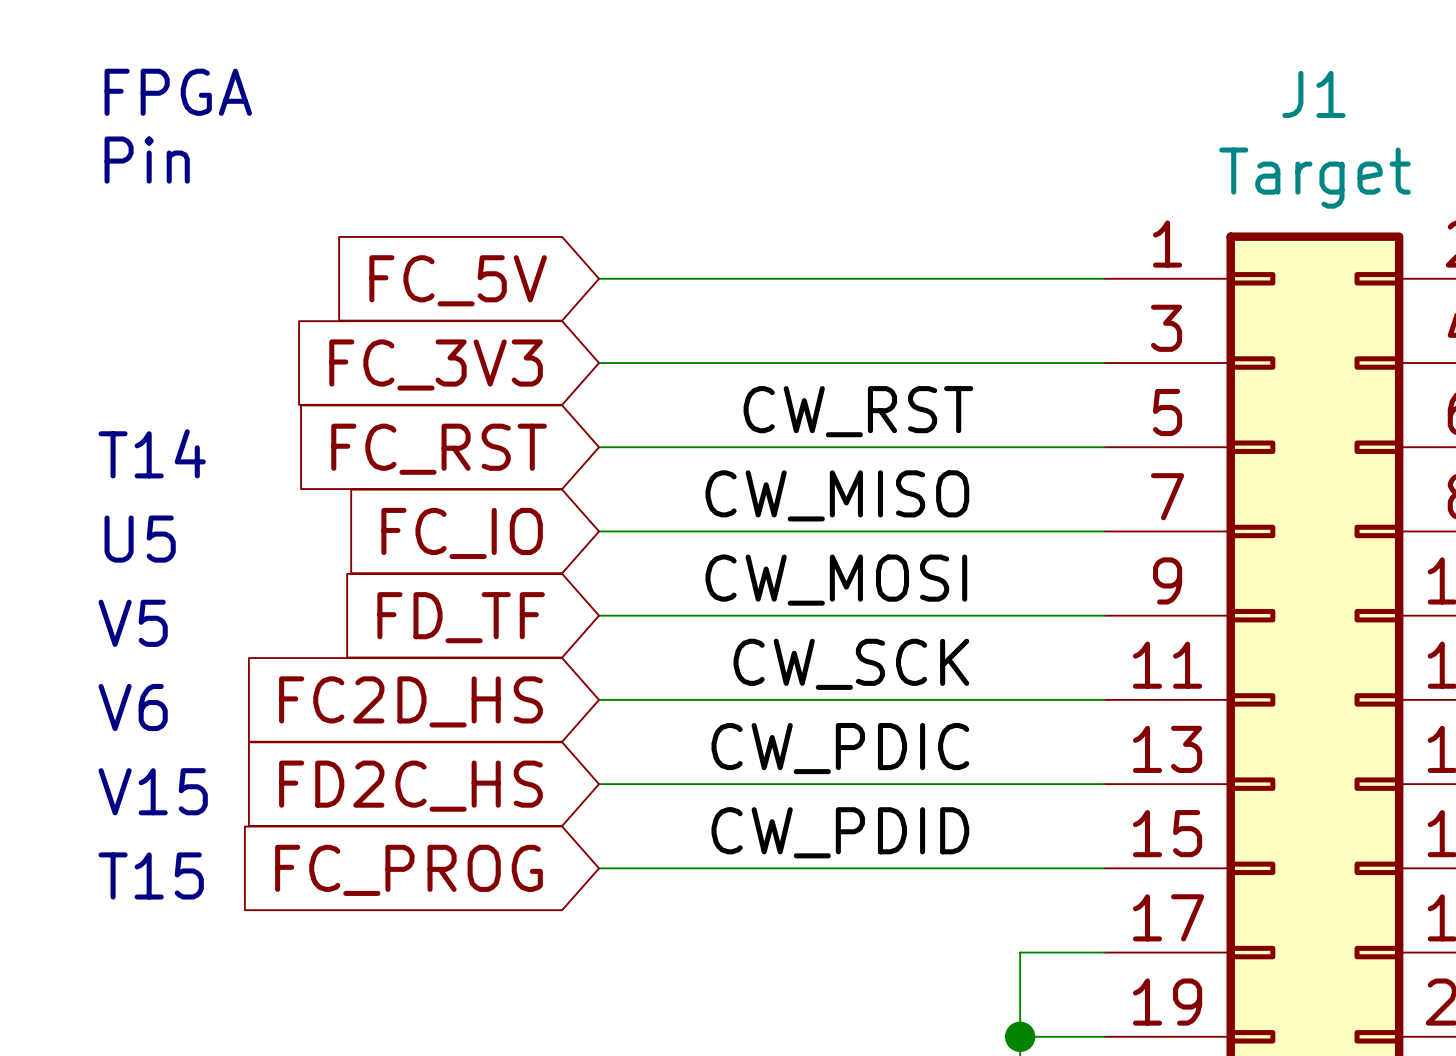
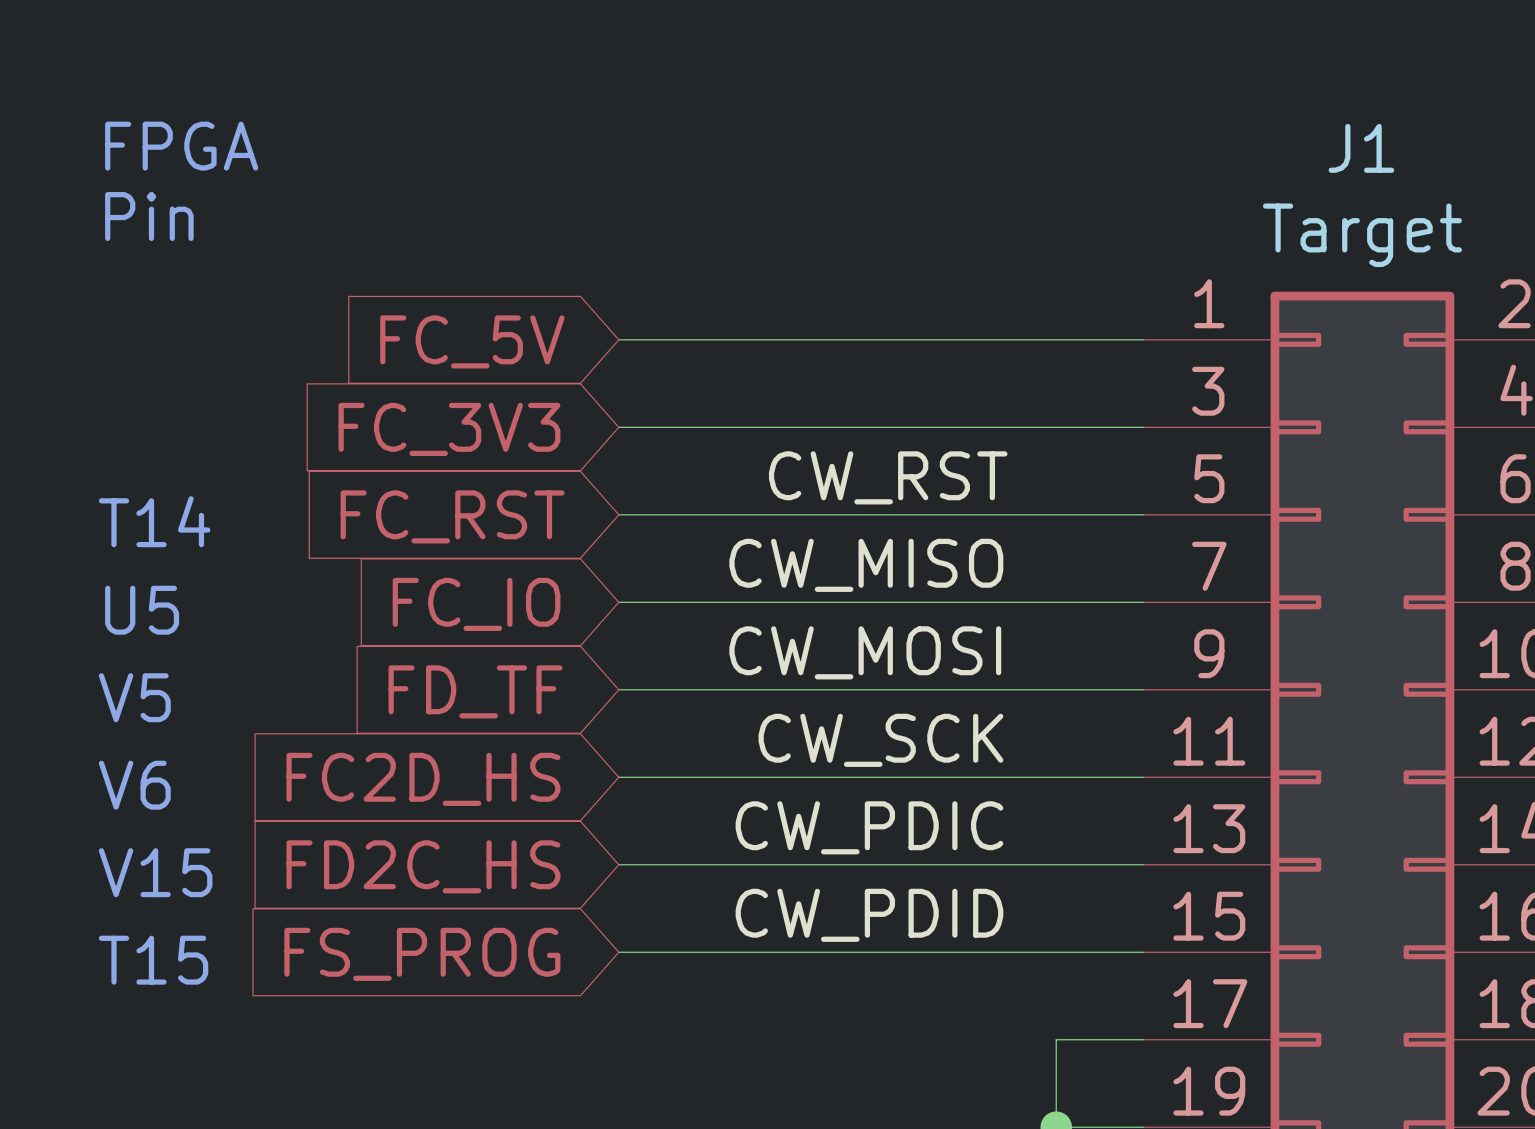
global label: FC_PROG (408, 870) -> FS_PROG (422, 954)

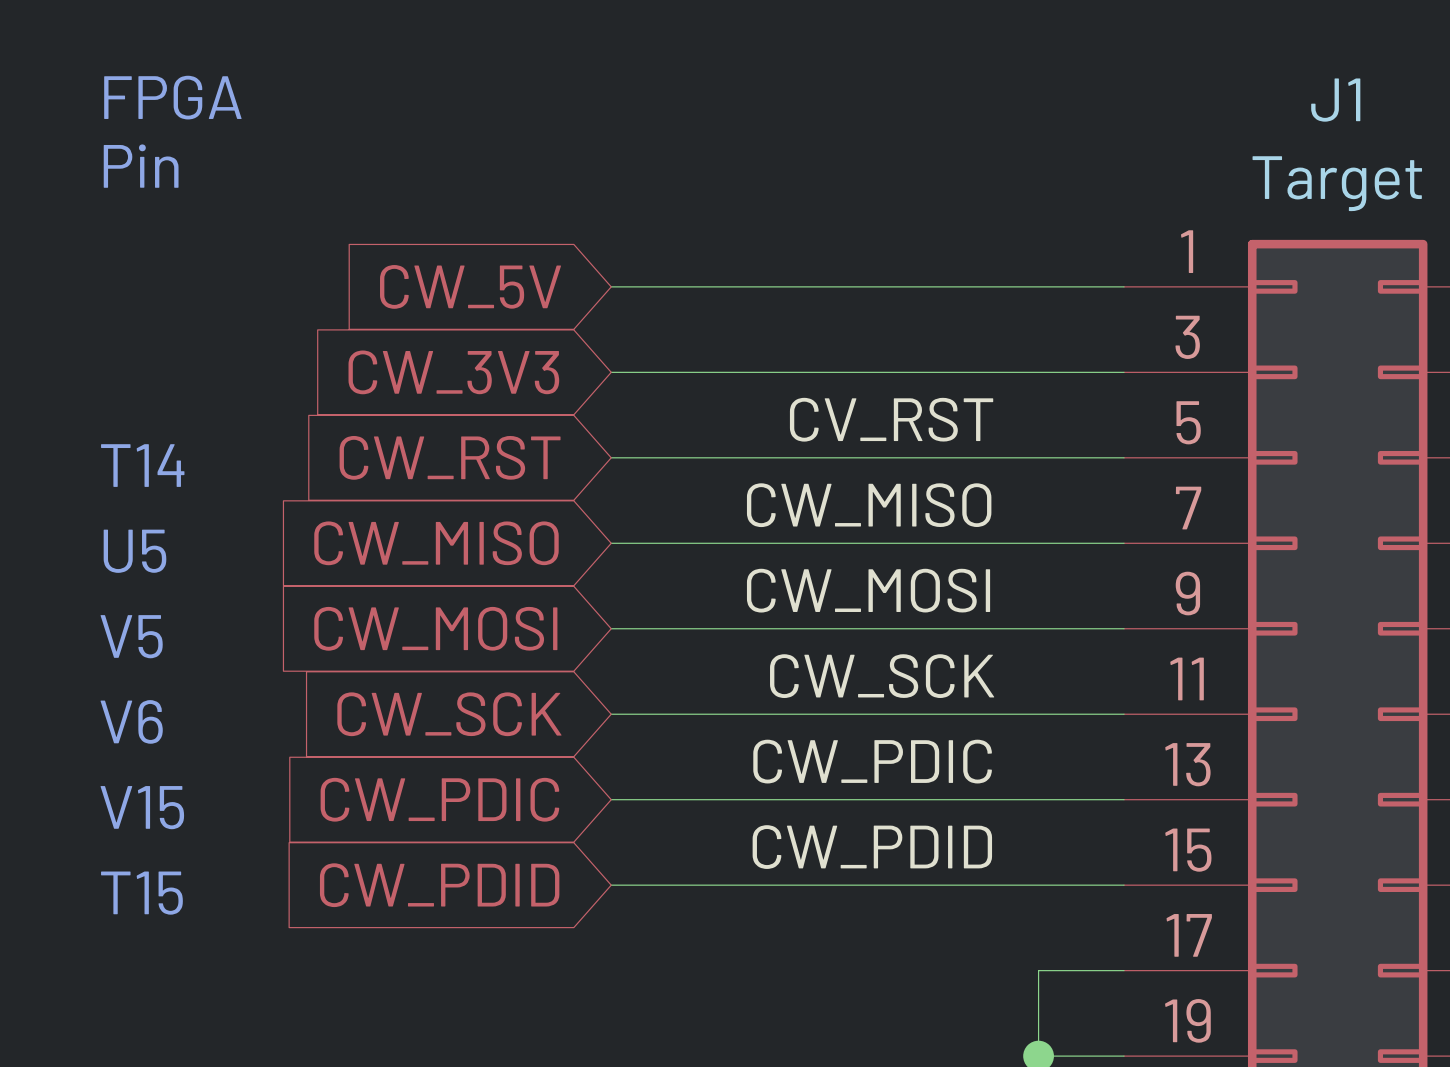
global label: FC_5V (472, 341) -> CW_5V (470, 286)
global label: FC_3V3 (449, 429) -> CW_3V3 (453, 372)
label: CW_RST (888, 477) -> CV_RST (891, 419)
global label: FC_RST (452, 516) -> CW_RST (450, 457)
global label: FC_IO (476, 604) -> CW_MISO (436, 543)
global label: FD_TF (475, 691) -> CW_MOSI (435, 628)
global label: FC2D_HS (423, 779) -> CW_SCK (449, 714)
global label: FD2C_HS (423, 866) -> CW_PDIC (439, 799)
global label: FS_PROG (422, 954) -> CW_PDID (439, 885)

